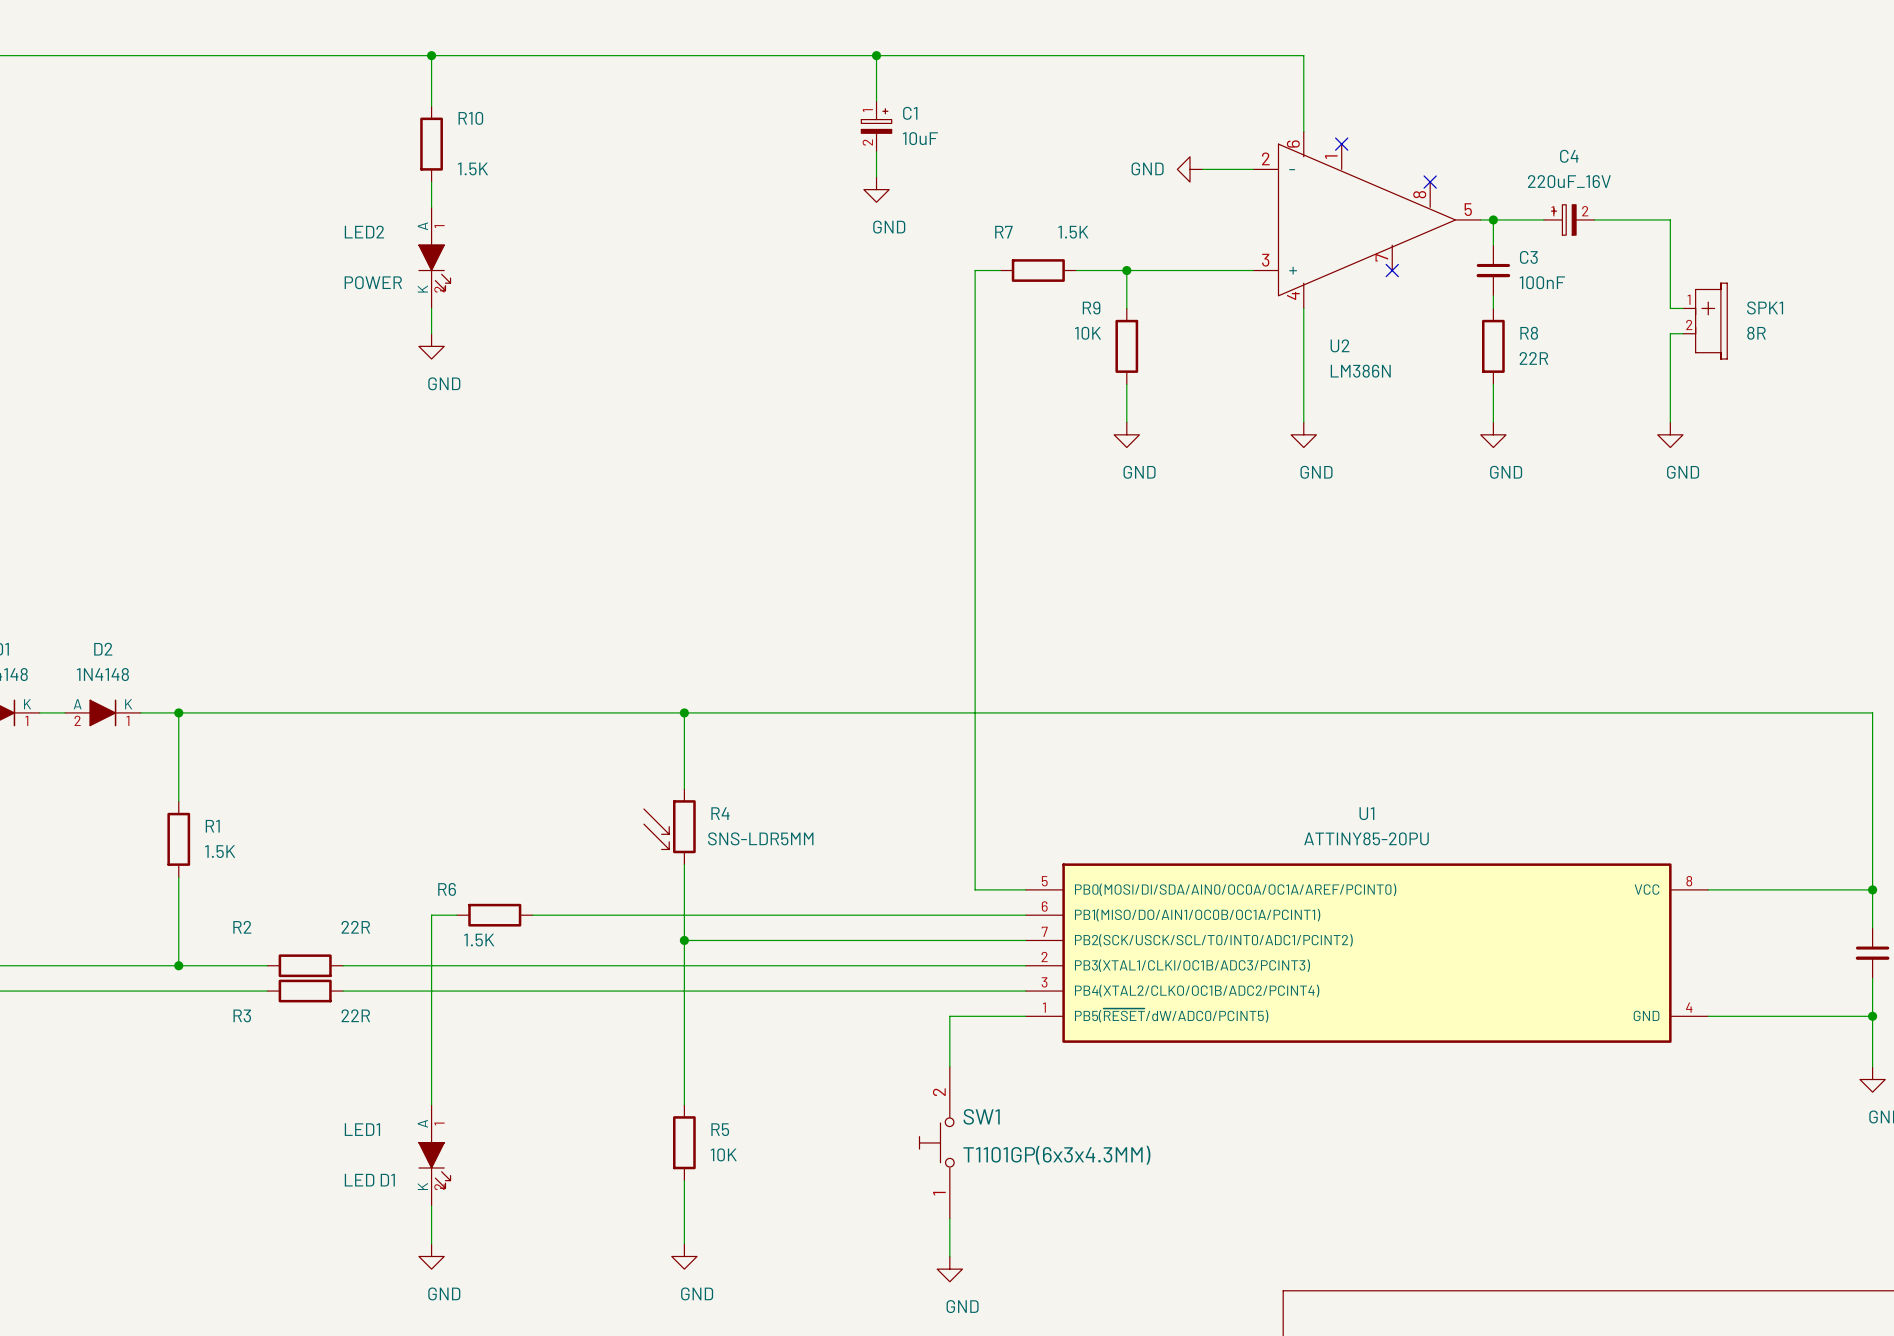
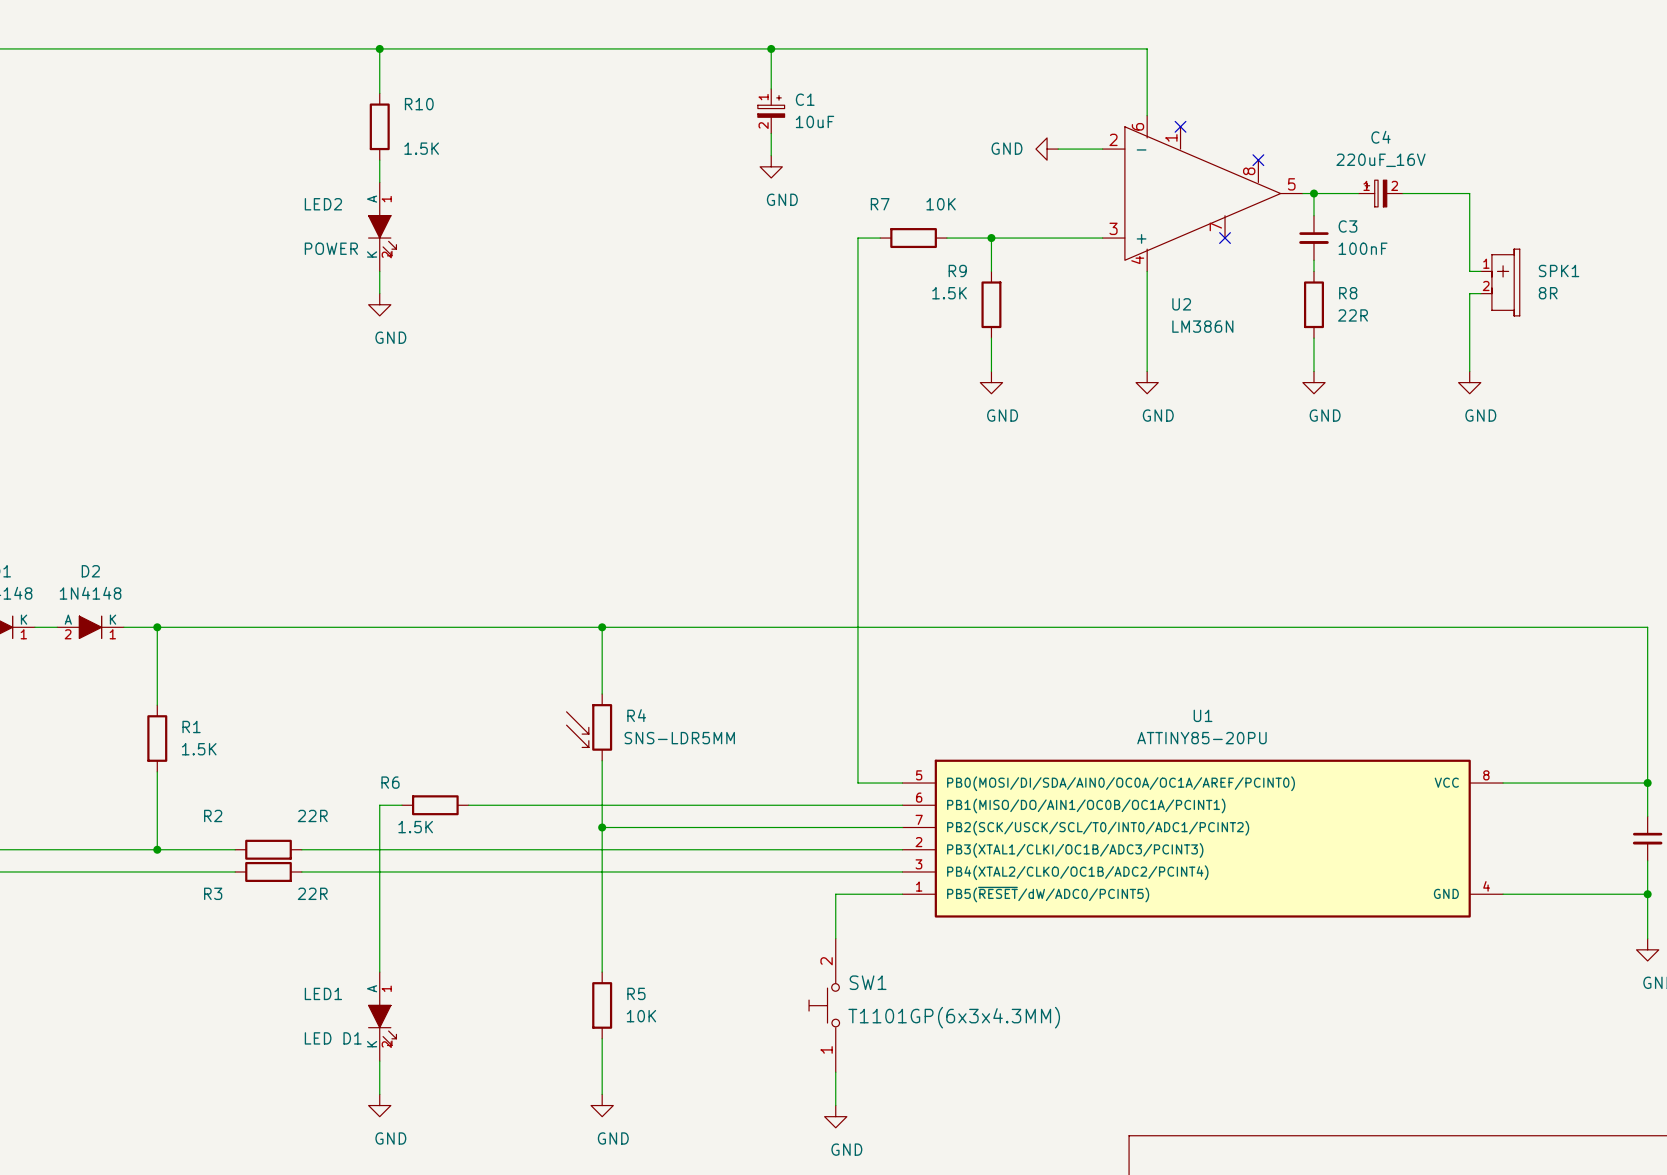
R7 value: 1.5K (1073, 232) -> 10K (941, 204)
R9 value: 10K (1088, 333) -> 1.5K (949, 293)

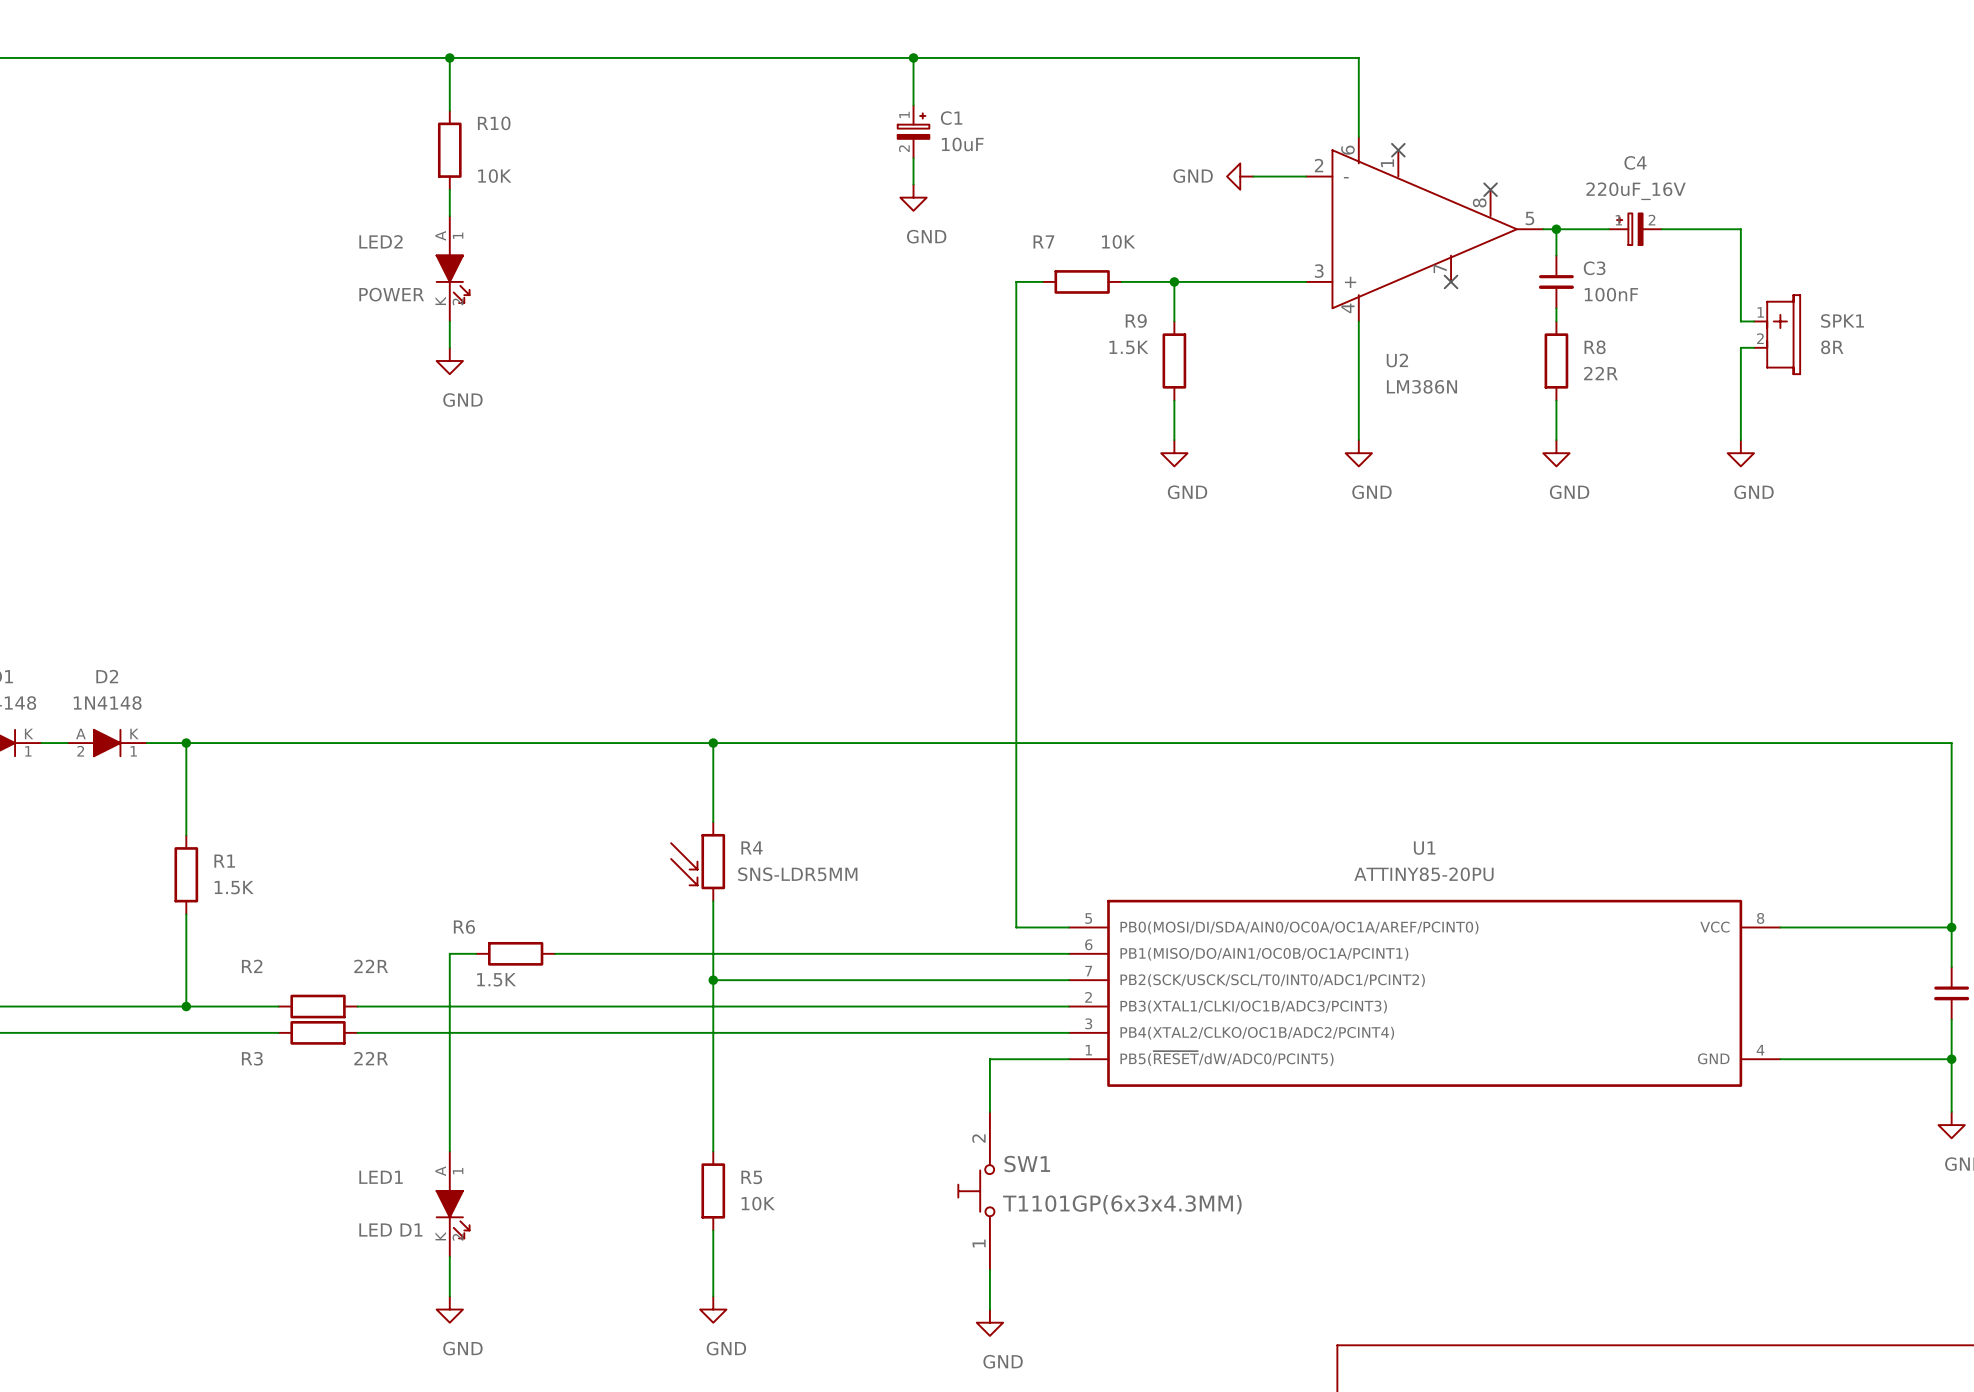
R10 value: 1.5K (421, 148) -> 10K (494, 176)

